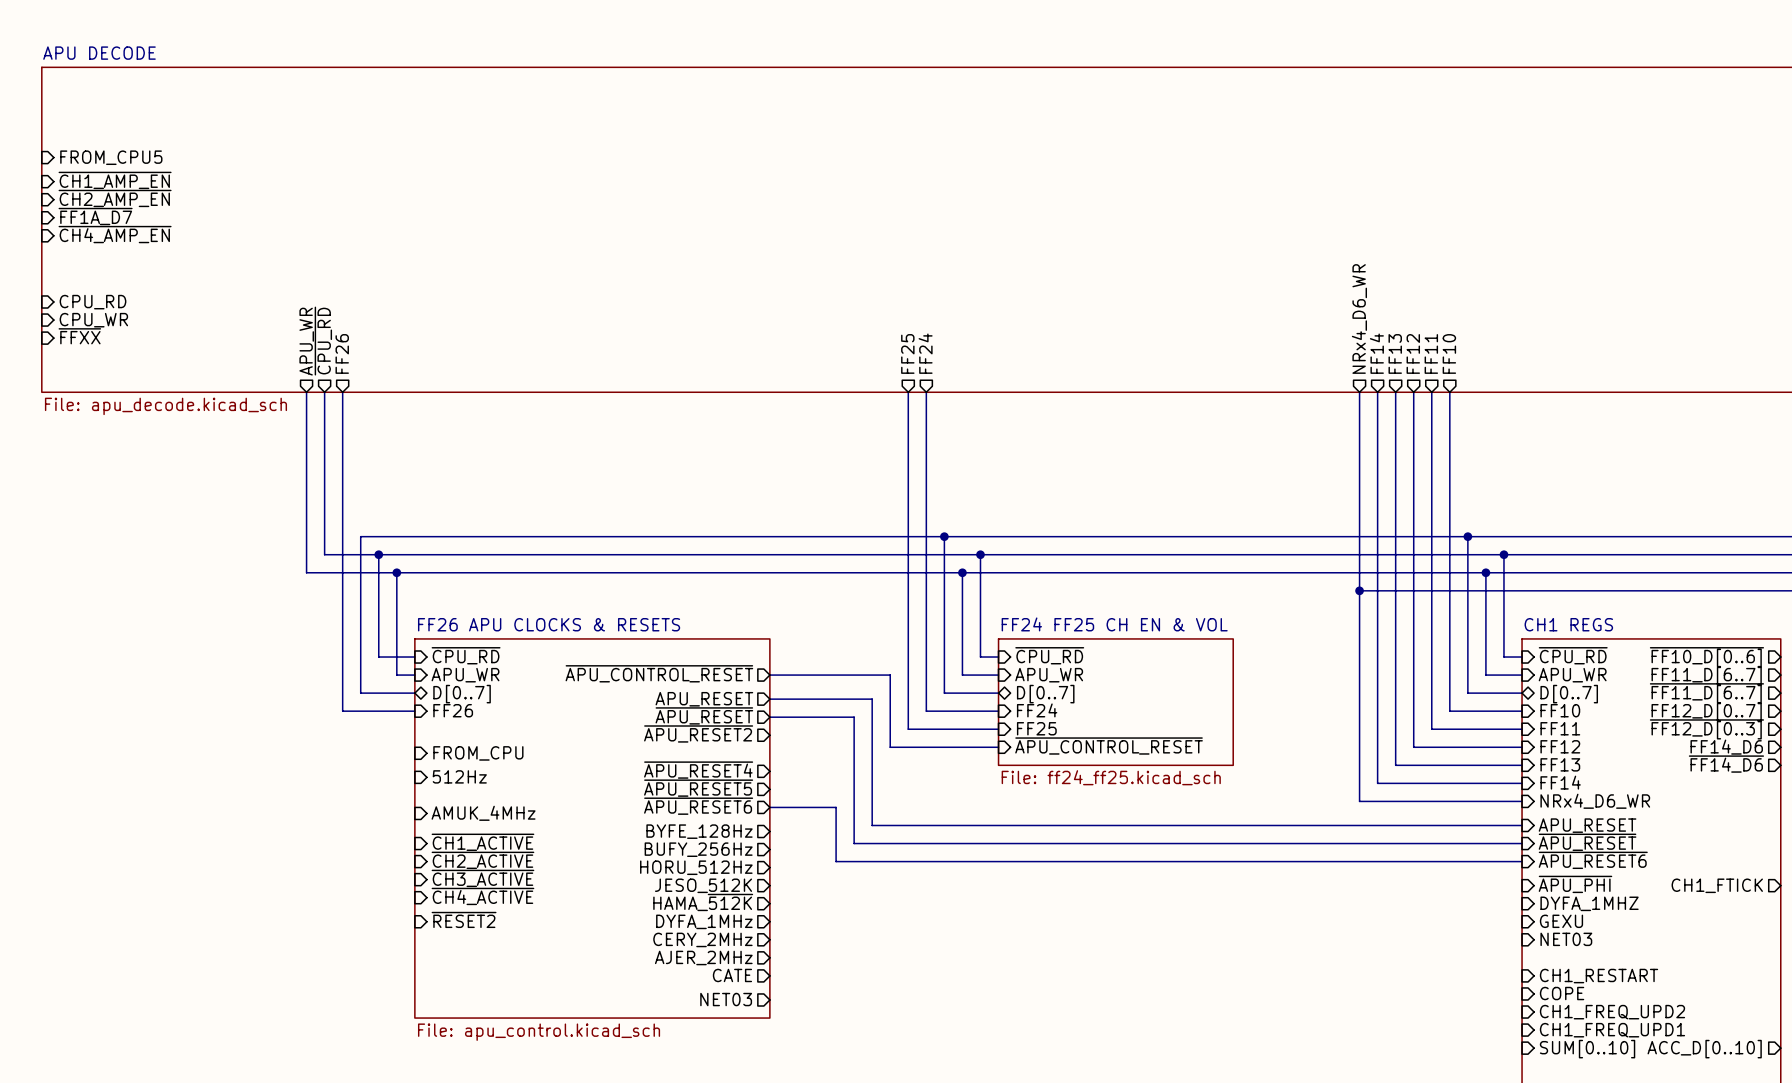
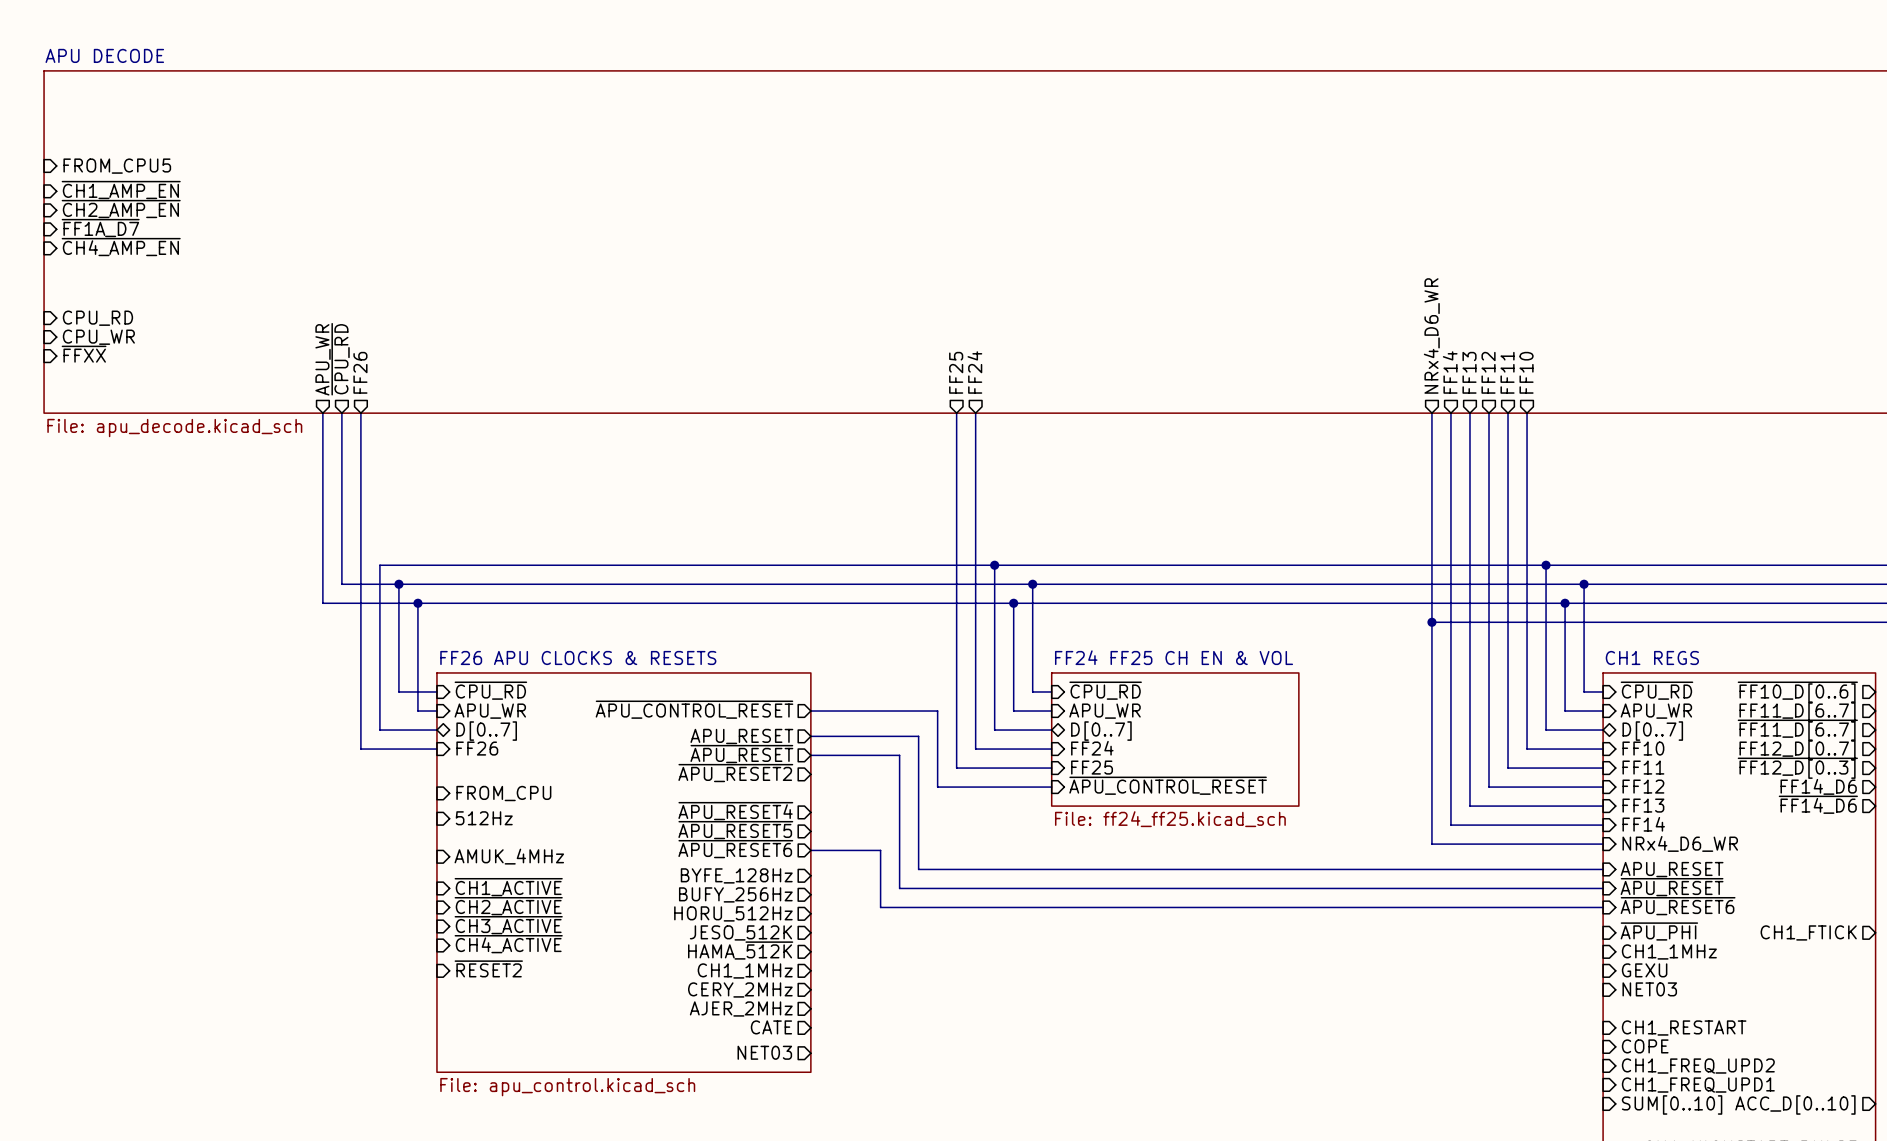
sheet pin: DYFA_1MHZ (1589, 903) -> CH1_1MHz (1669, 951)
sheet pin: DYFA_1MHz (704, 921) -> CH1_1MHz (745, 970)

